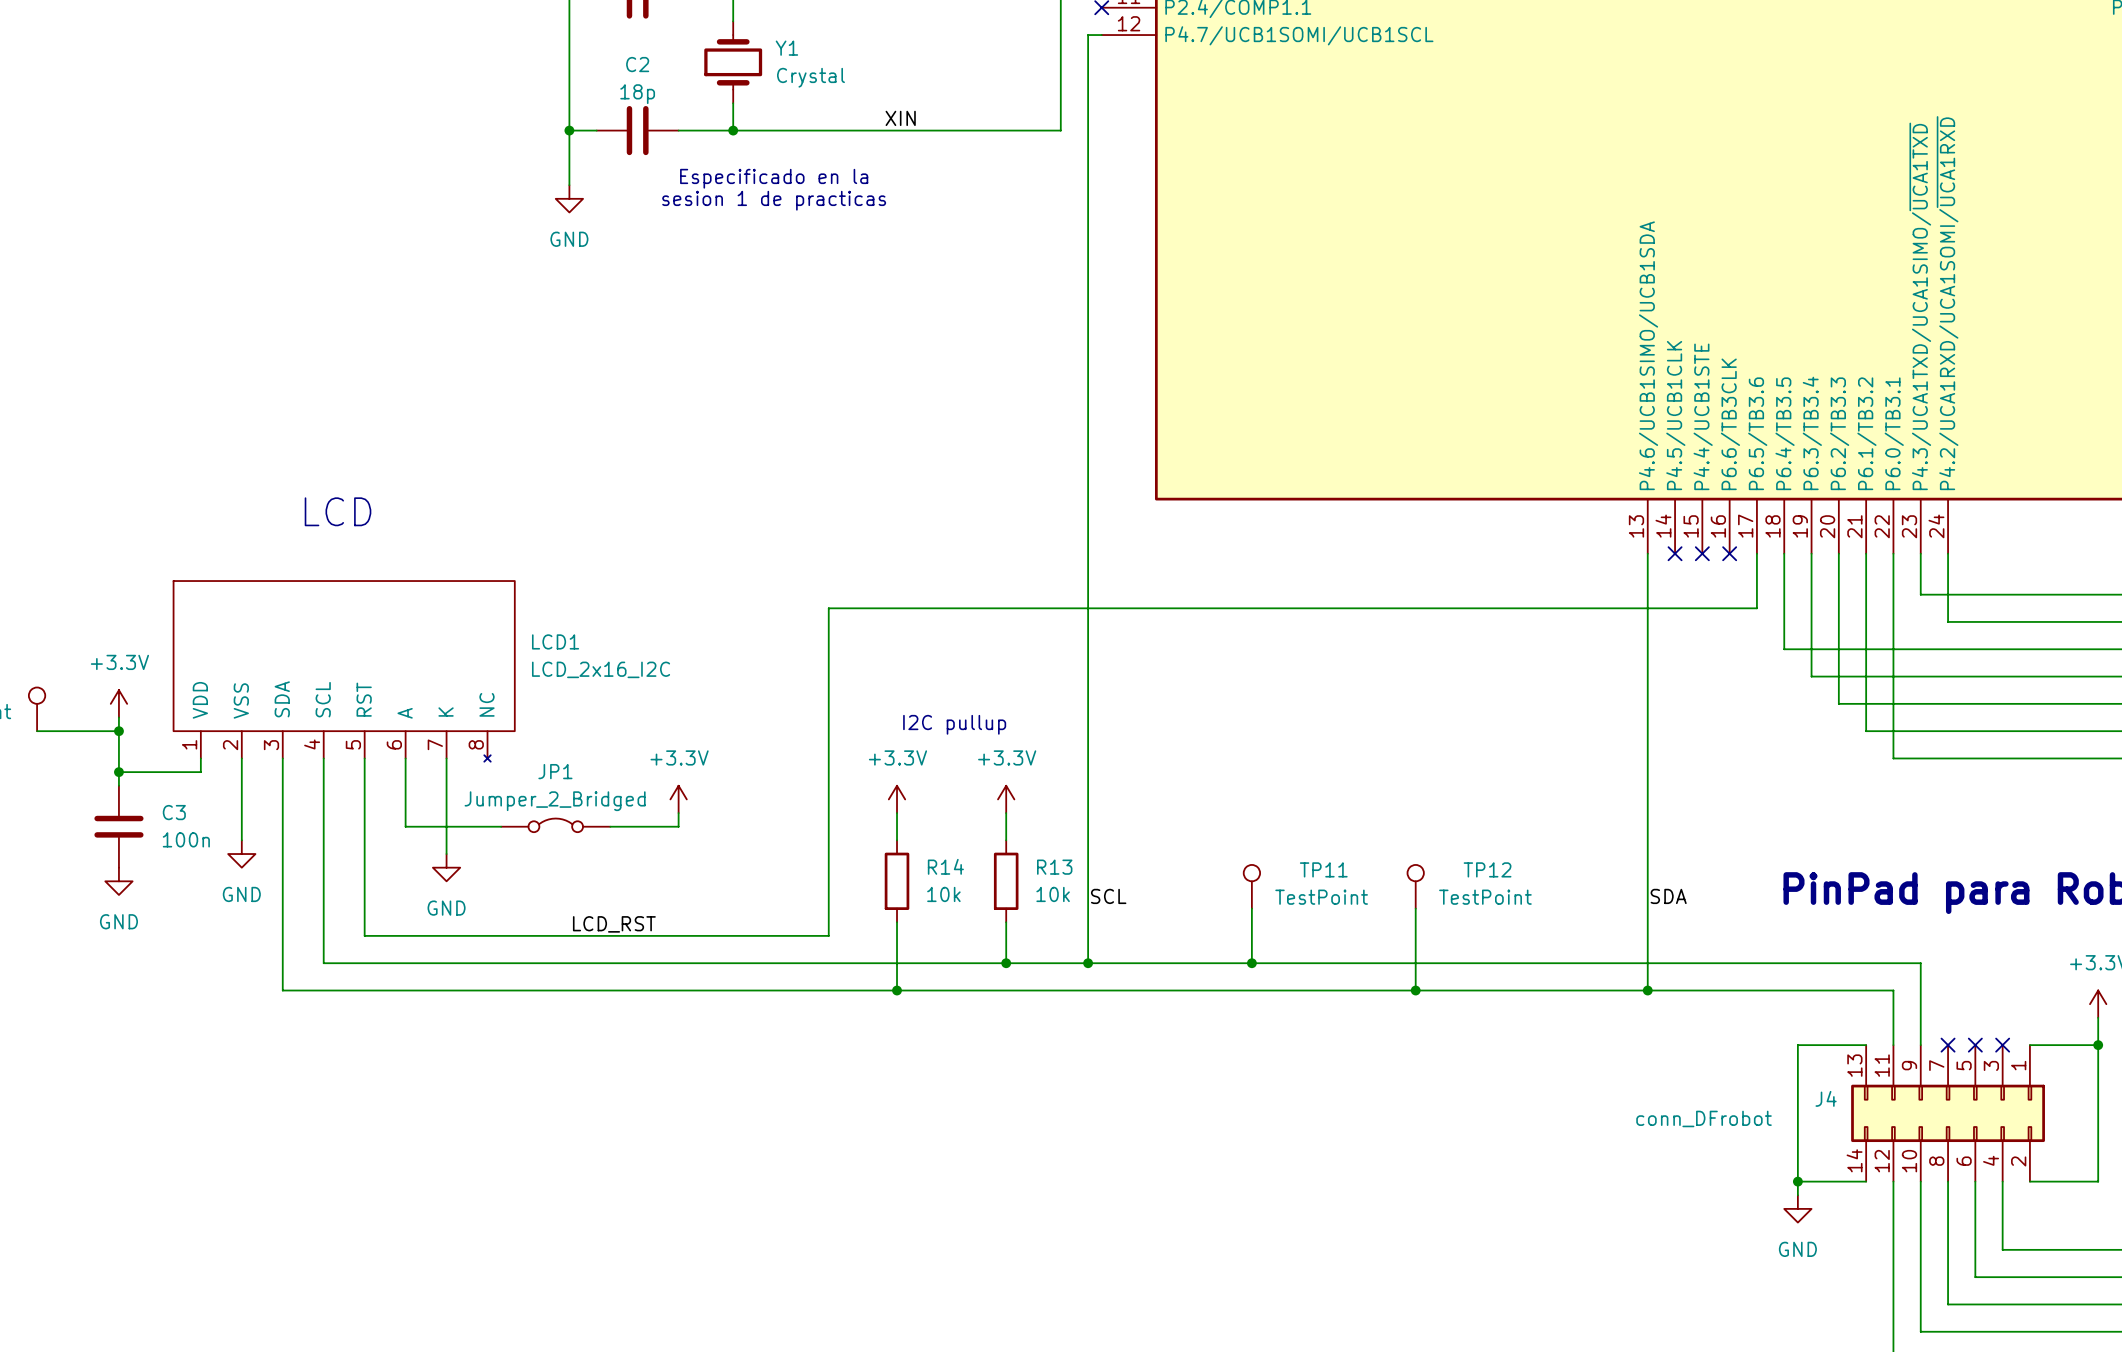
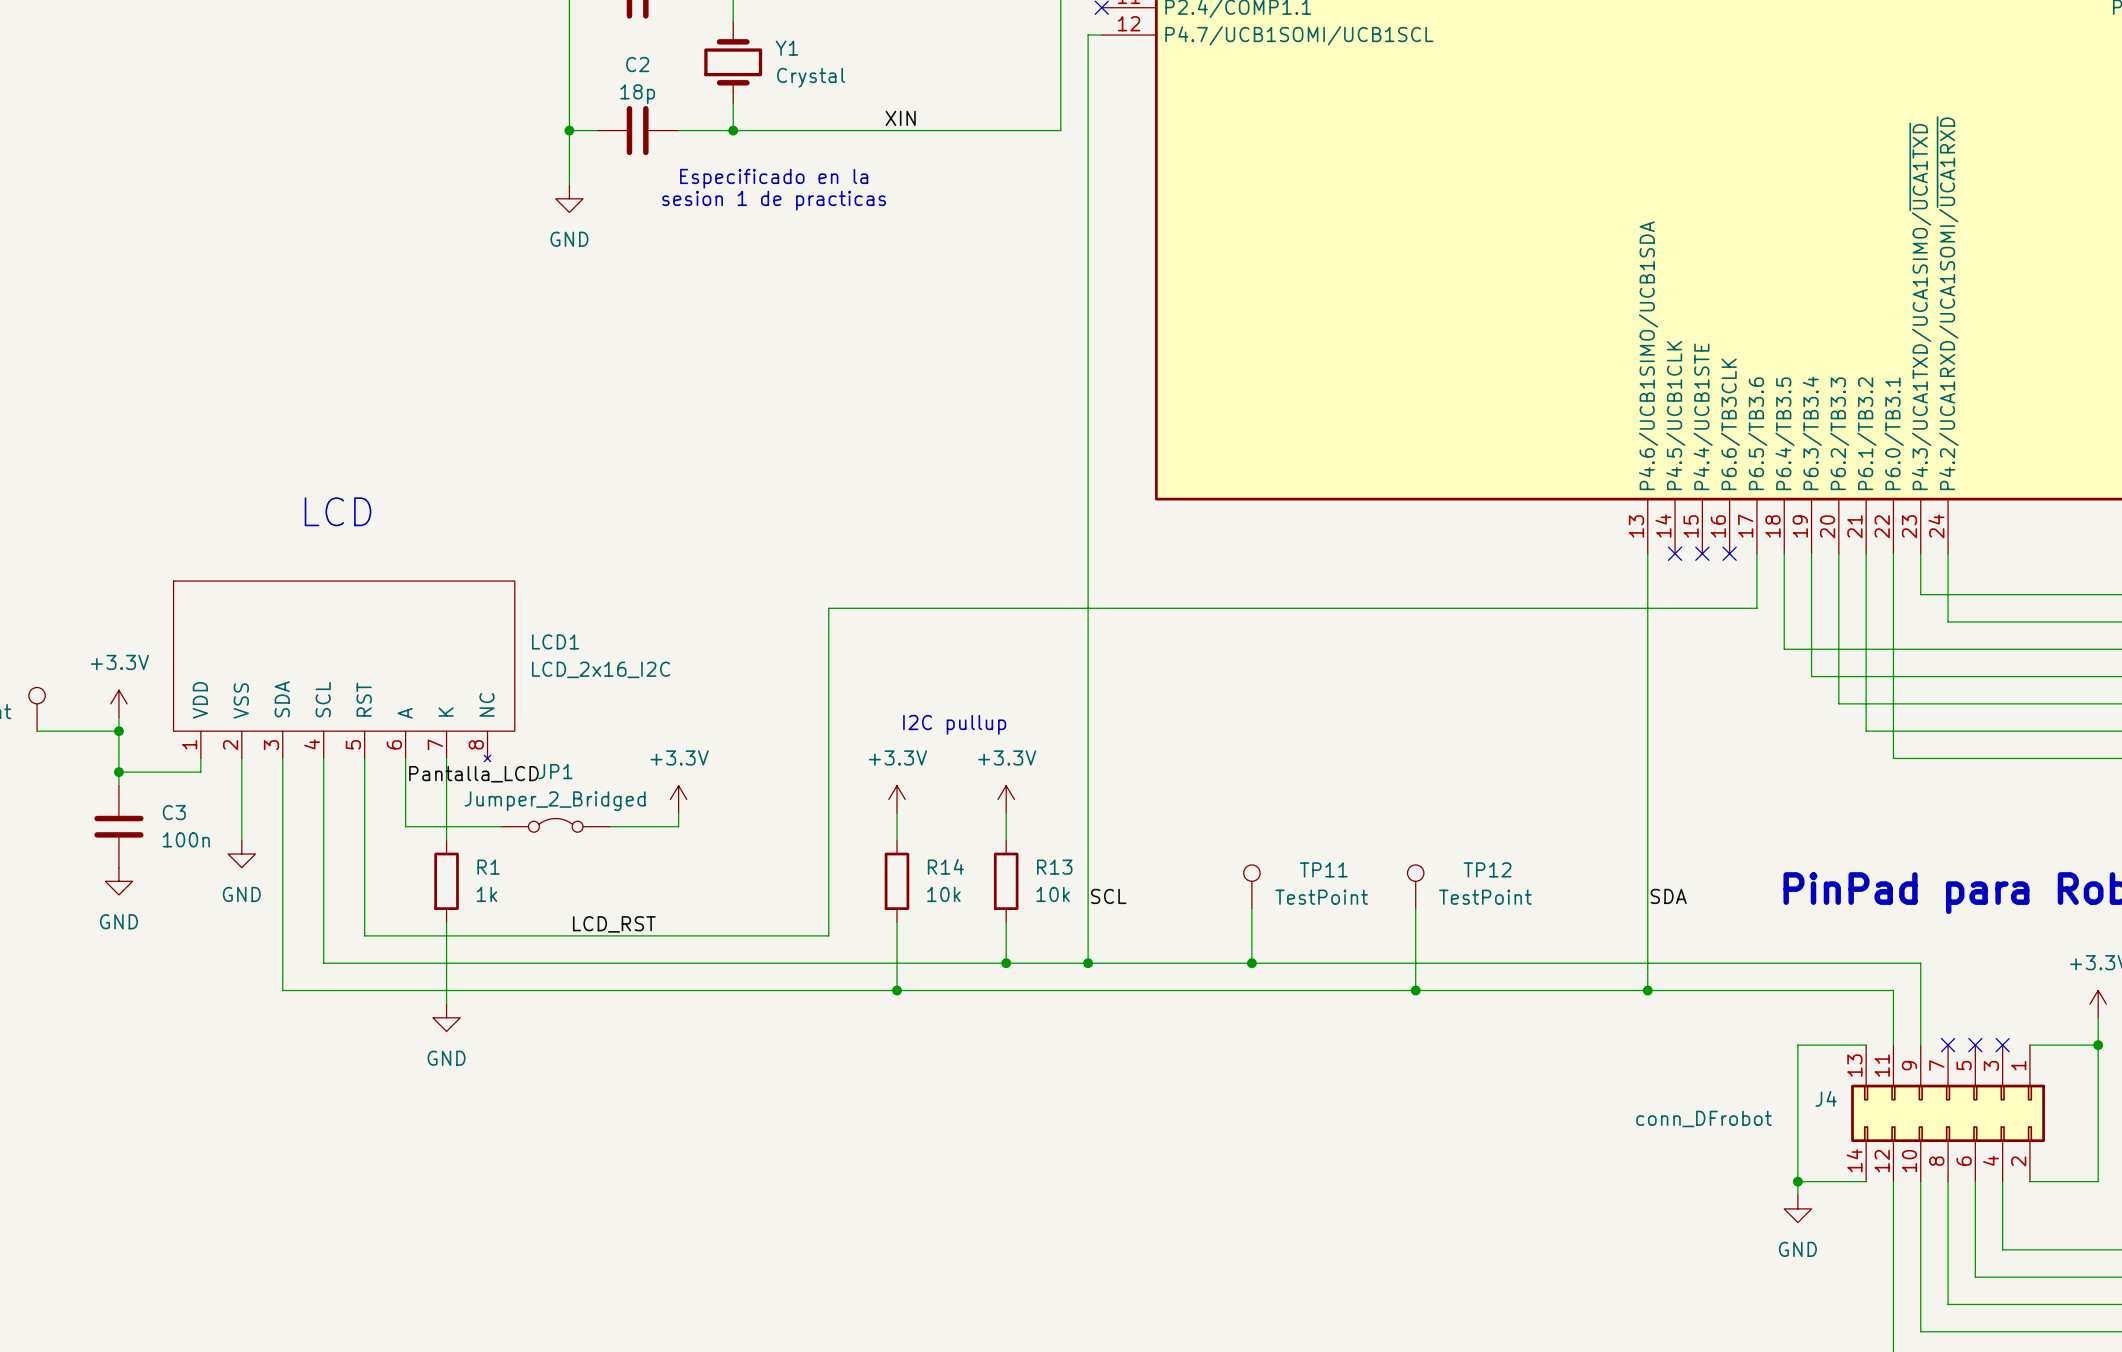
label: none -> Pantalla_LCD (473, 774)
power symbol position: GND (446, 867) -> GND (446, 1017)
R1: none -> 1k (446, 881)
wire: none -> (446, 922) (446, 1004)

